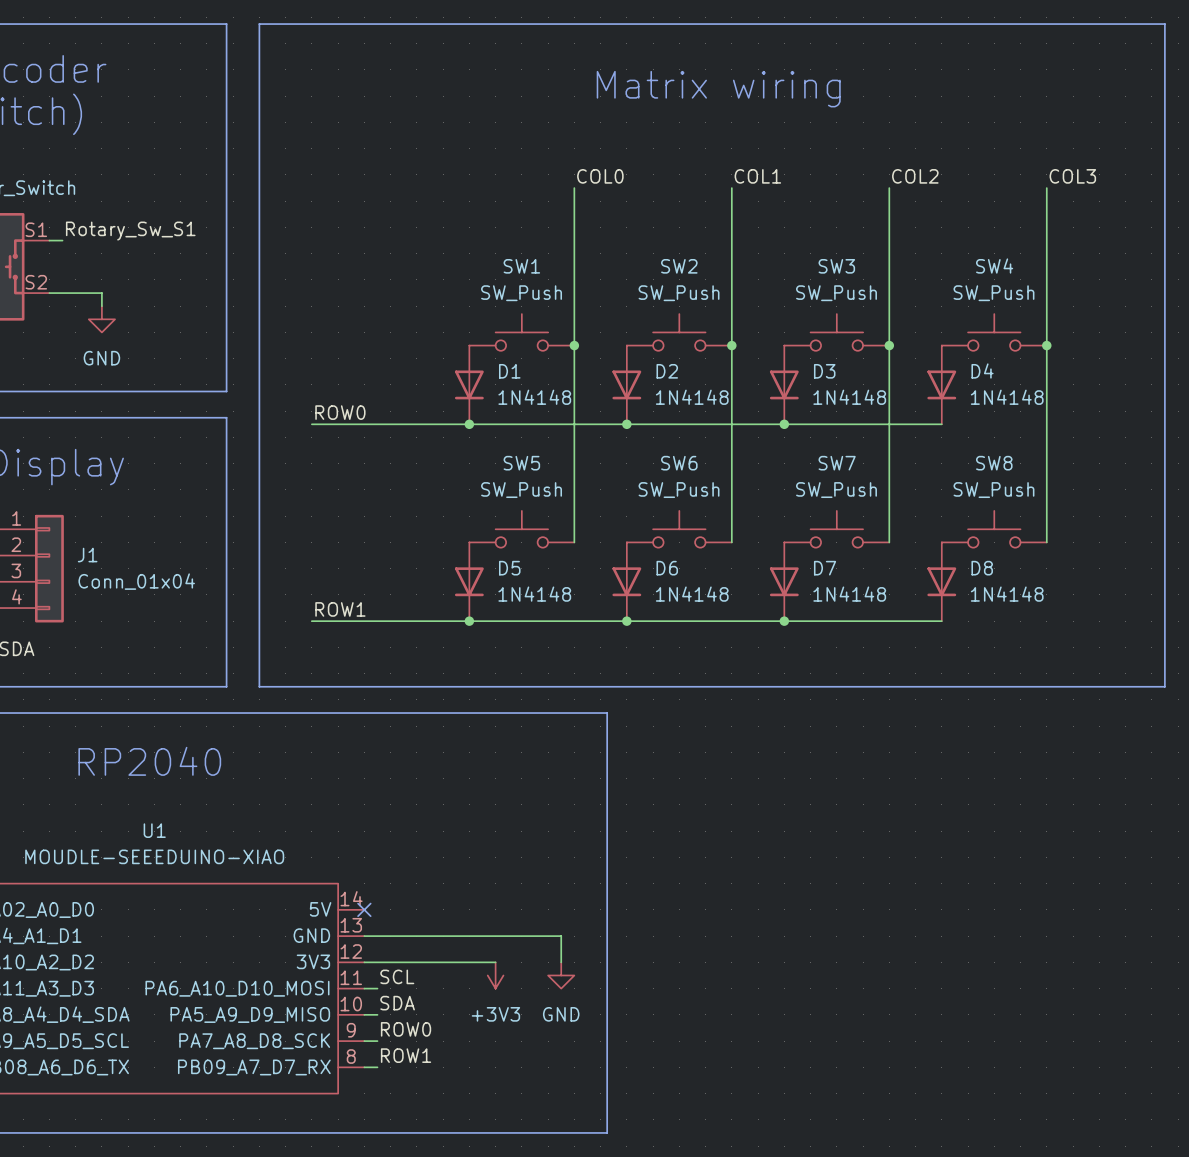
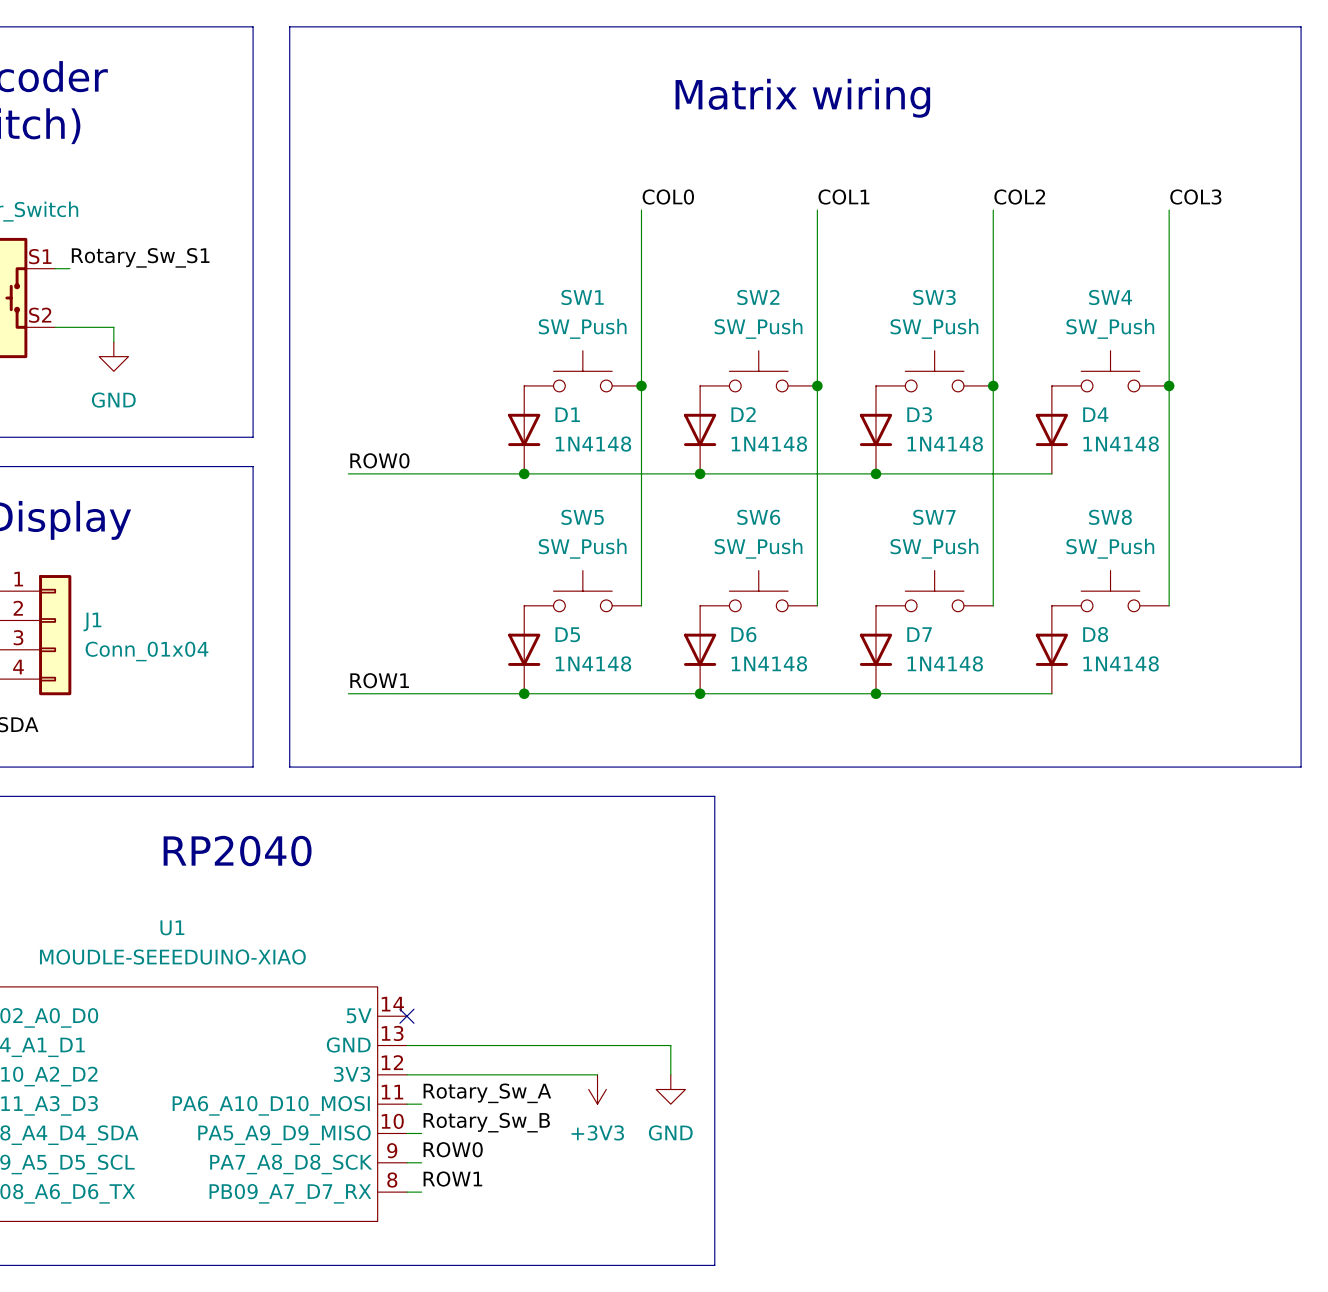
line: (607, 713) (607, 1132) -> (678, 796) (714, 796) (714, 1265) (678, 1265)
text position: RP2040 (149, 761) -> RP2040 (237, 851)
wire: (561, 936) (561, 962) -> (626, 1045) (670, 1045) (670, 1074)
wire: none -> (553, 1074) (597, 1074)
power symbol position: +3V3 (495, 975) -> +3V3 (597, 1089)
power symbol position: GND (561, 975) -> GND (670, 1089)
label: SCL (397, 976) -> Rotary_Sw_A (487, 1093)
label: SDA (397, 1003) -> Rotary_Sw_B (486, 1122)

